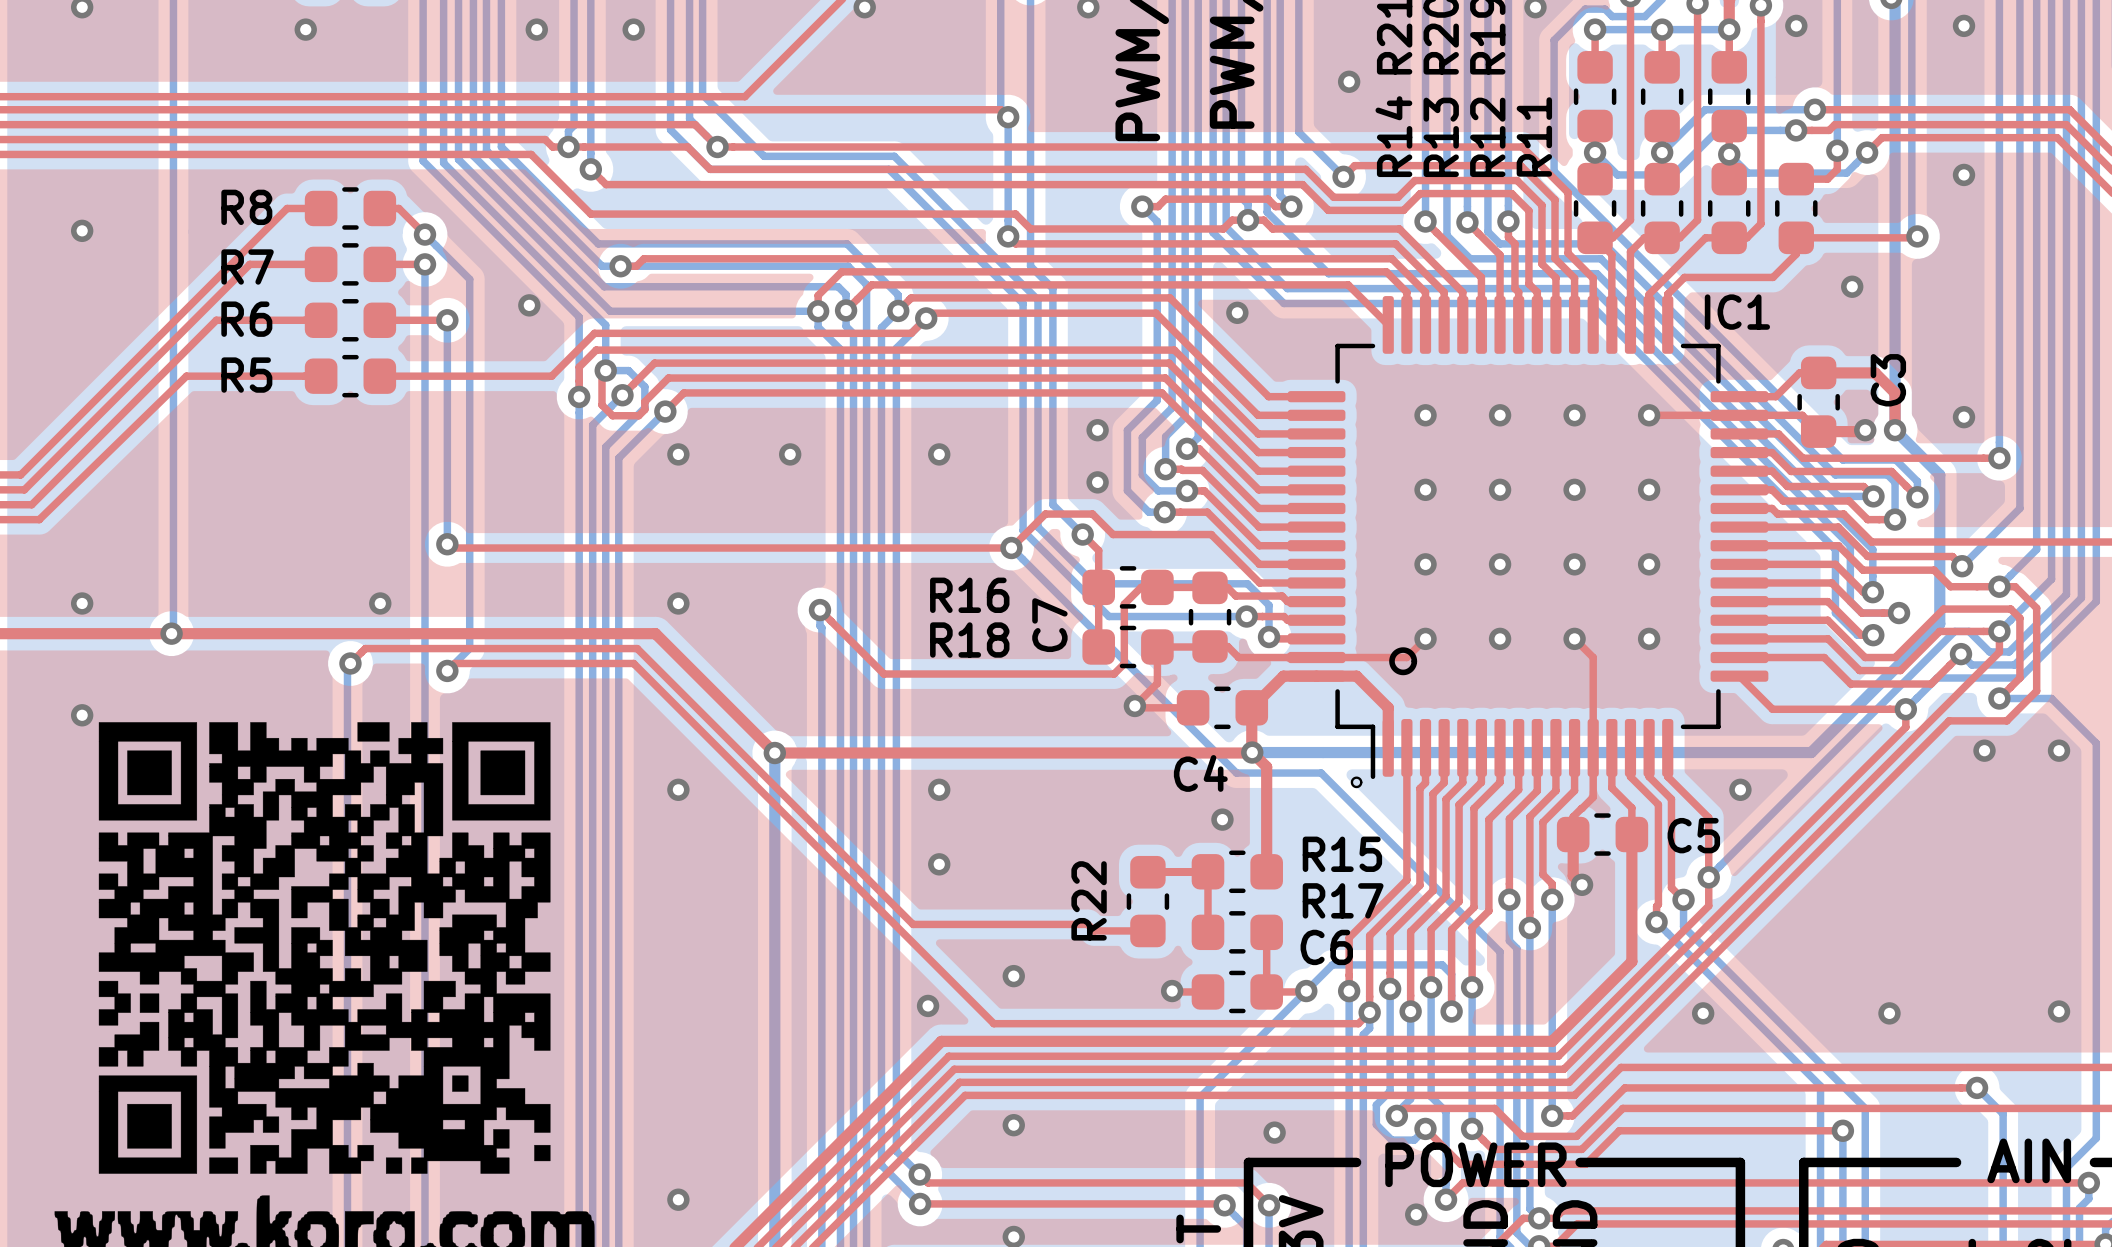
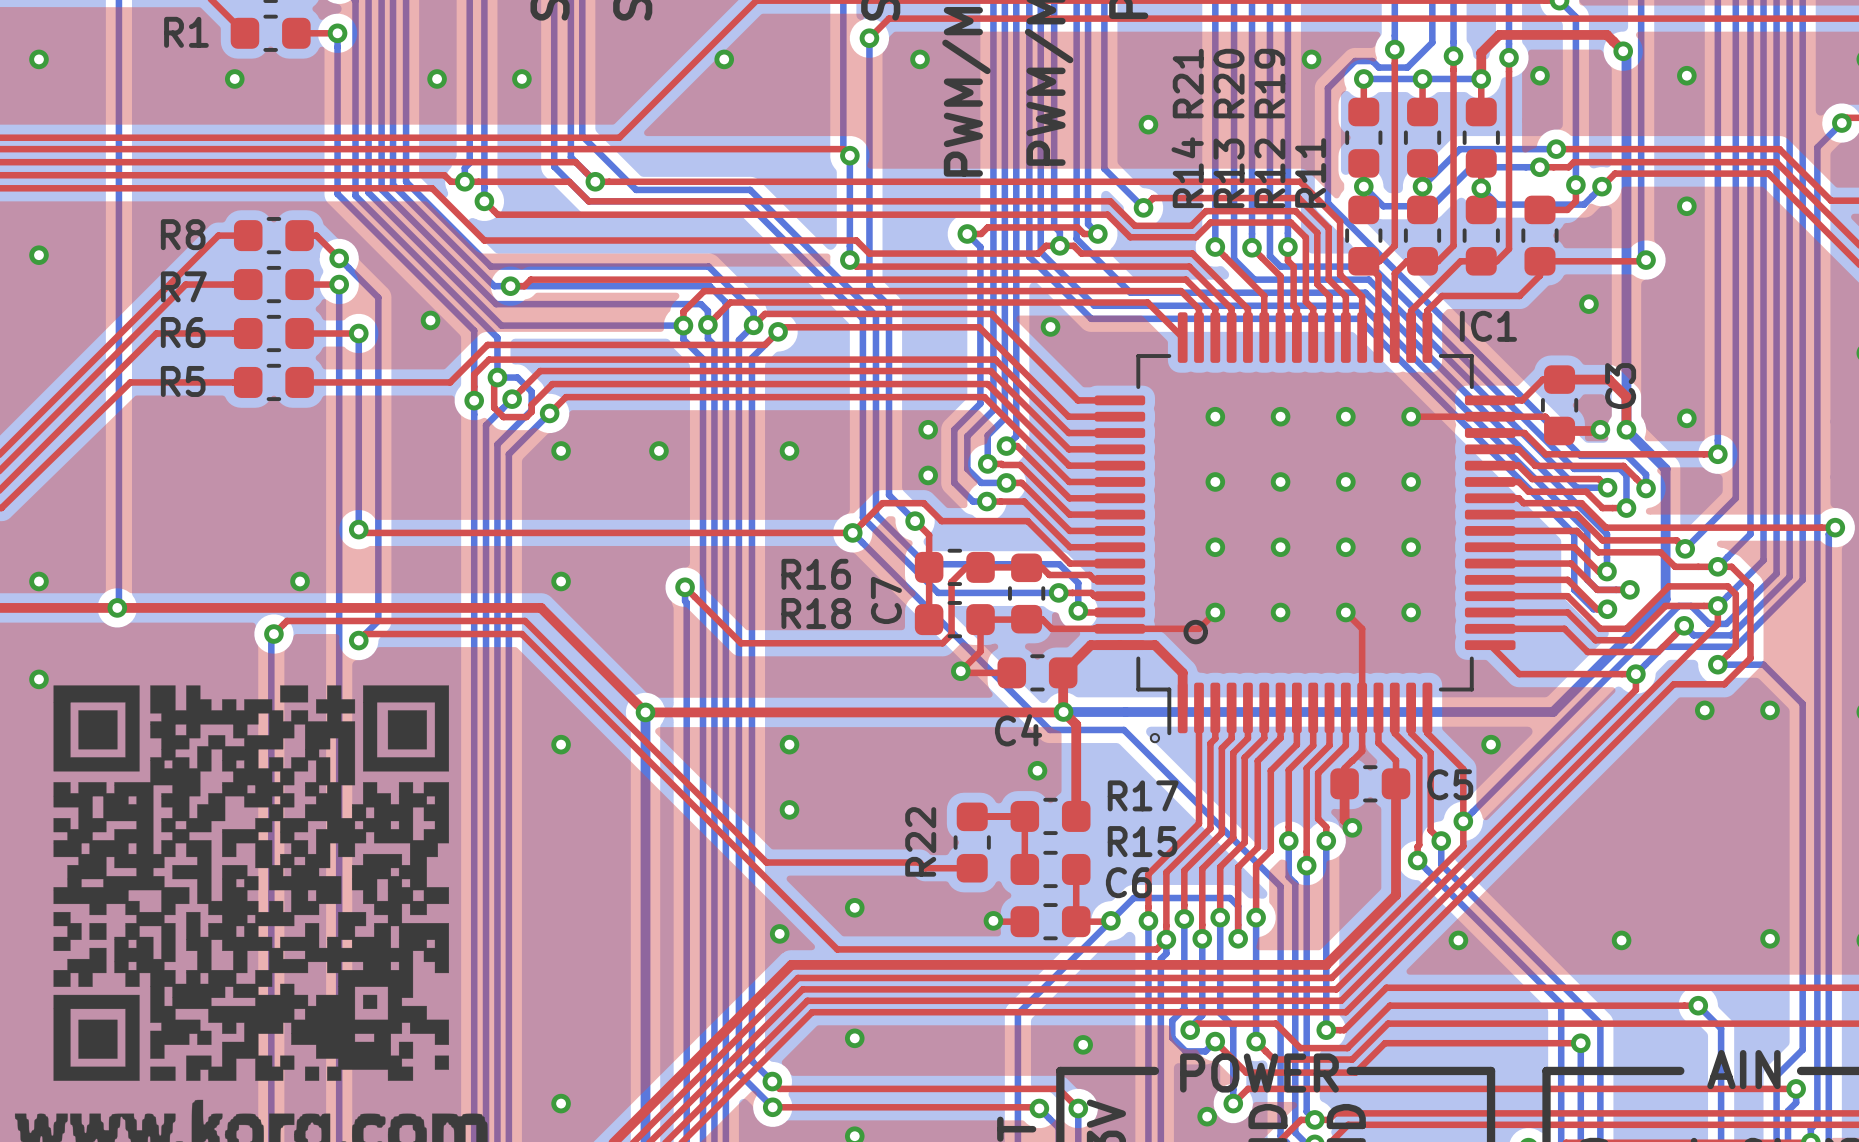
R15 name position: R15 (1342, 854) -> R15 (1142, 841)
R17 name position: R17 (1343, 900) -> R17 (1143, 795)

